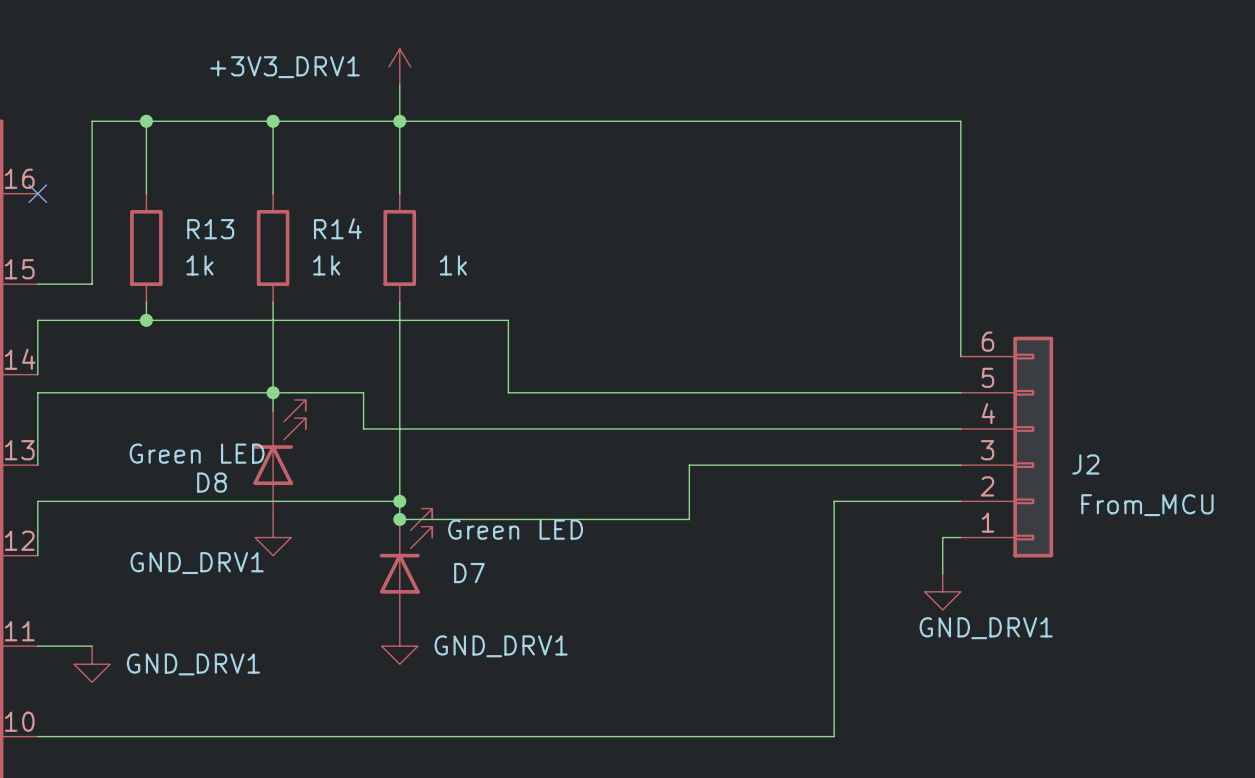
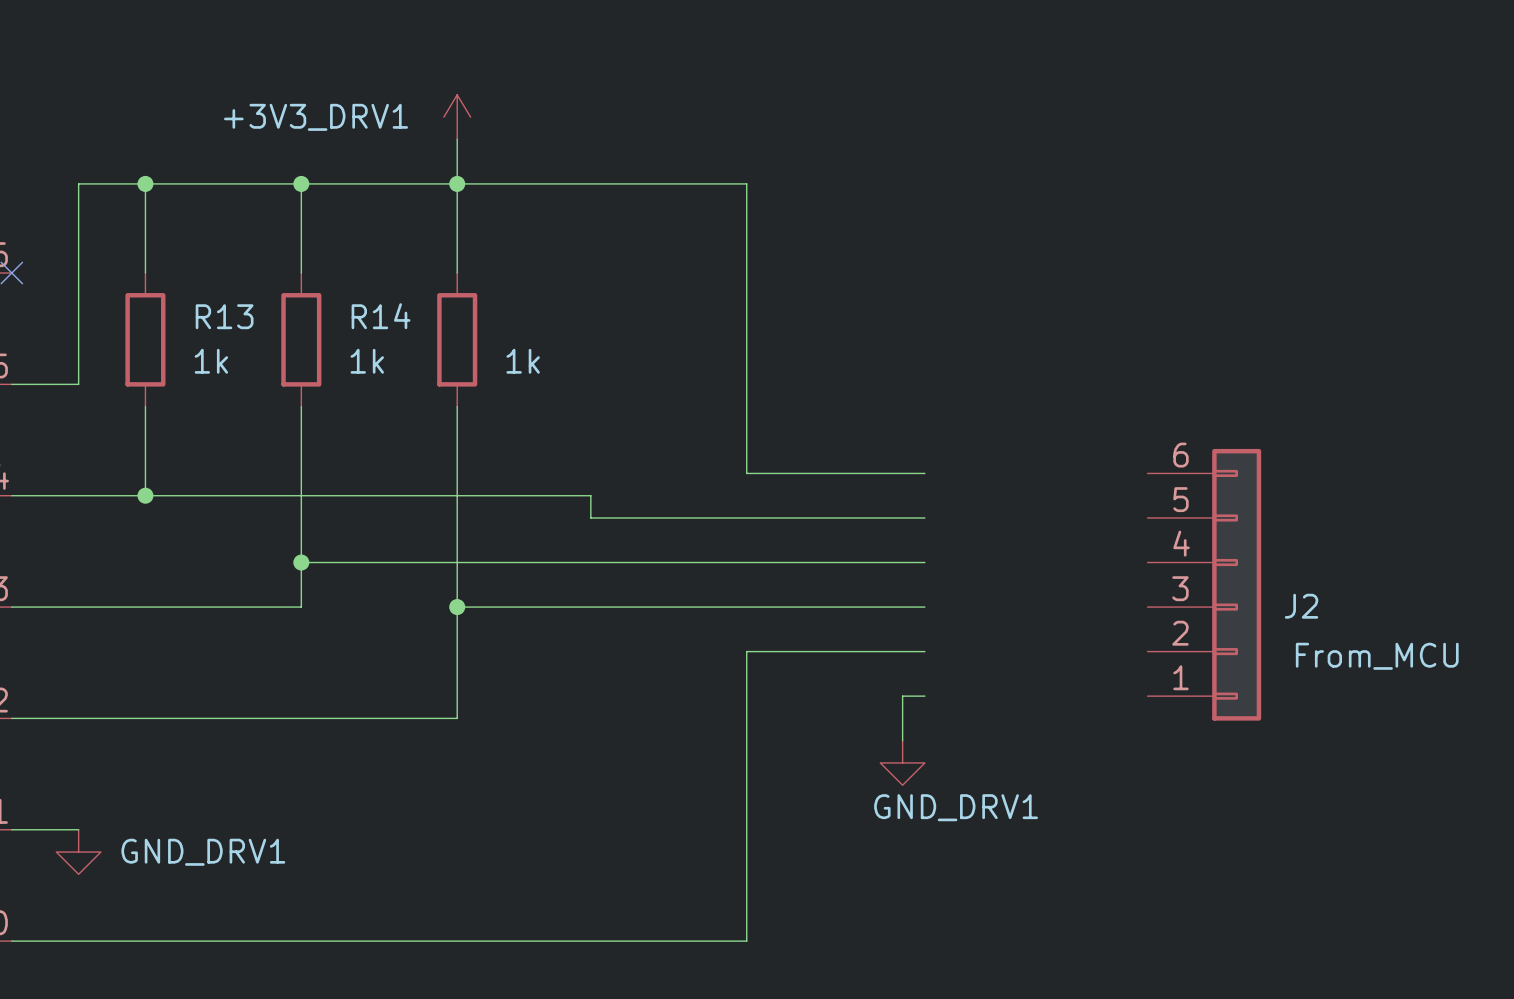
wire: (635, 121) (960, 121) (960, 356) -> (746, 183) (746, 473) (924, 473)
wire: none -> (145, 428) (145, 495)
junction position: (146, 320) -> (145, 495)
wire: (37, 374) (37, 320) (508, 320) (508, 374) -> (11, 495) (590, 495)
junction position: (273, 392) -> (301, 562)
wire: (779, 392) (960, 392) -> none
wire: none -> (301, 562) (412, 562)
wire: (363, 428) (363, 392) (37, 392) (37, 465) -> (301, 540) (301, 607) (11, 607)
wire: (779, 428) (960, 428) -> none
D8: Green LED (279, 459) -> none
junction: none -> (457, 607)
wire: (689, 465) (689, 519) (399, 519) -> (813, 607) (457, 607)
wire: (779, 465) (960, 465) -> none
wire: (399, 501) (37, 501) (37, 555) -> (457, 673) (457, 718) (11, 718)
junction: (399, 501) -> none
wire: (960, 501) (834, 501) (834, 736) (635, 736) -> (924, 651) (746, 651) (746, 941)
junction: (399, 519) -> none
power symbol: GND_DRV1 (273, 537) -> none
wire: (960, 537) (942, 537) (942, 573) -> (924, 696) (902, 696) (902, 740)
D7: Green LED (406, 568) -> none
power symbol position: GND_DRV1 (942, 591) -> GND_DRV1 (902, 762)
power symbol: GND_DRV1 (399, 646) -> none

